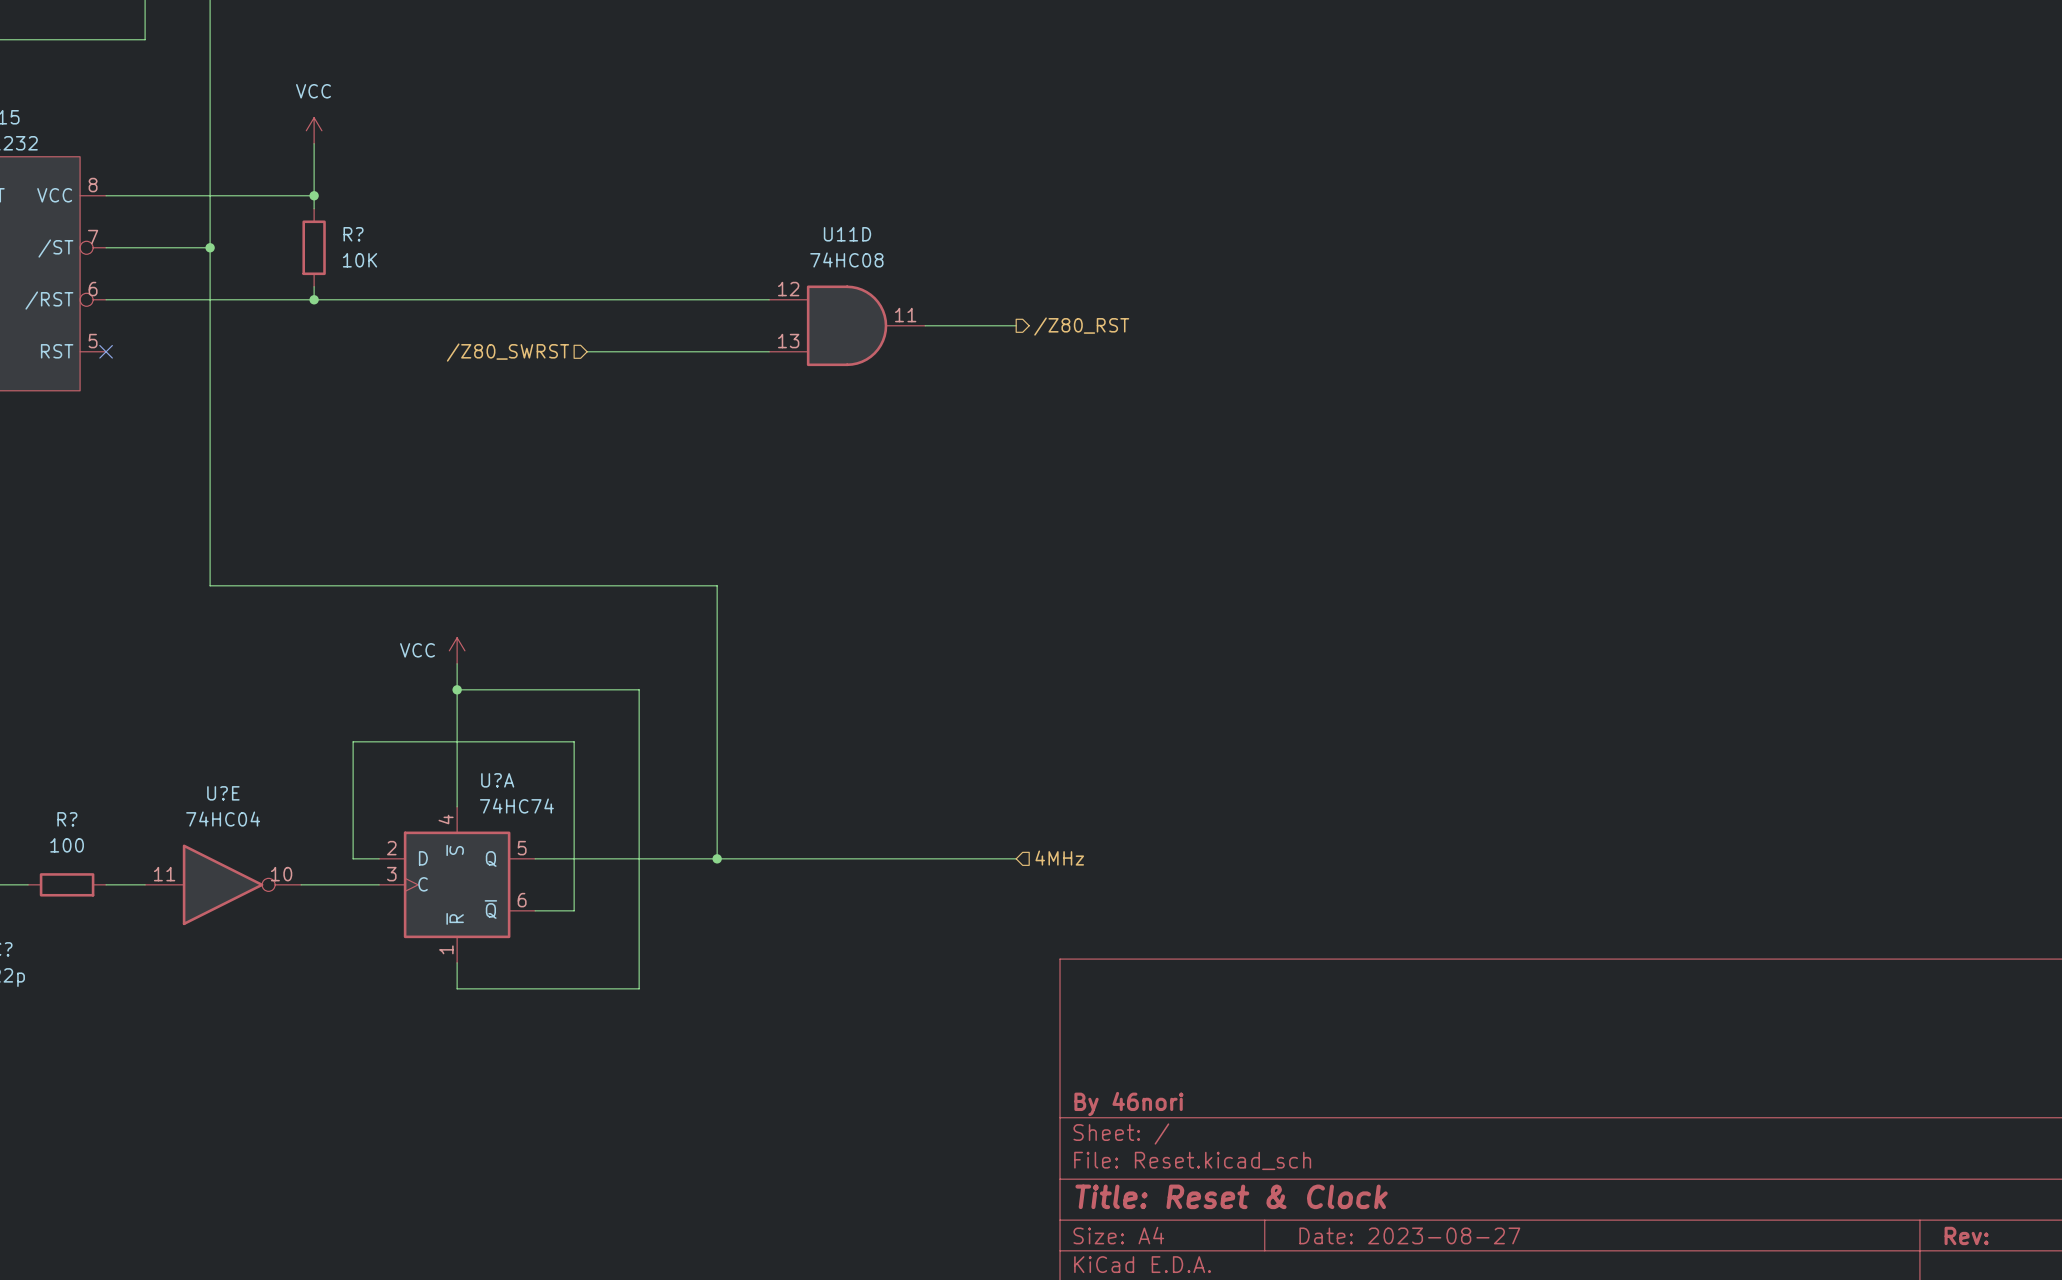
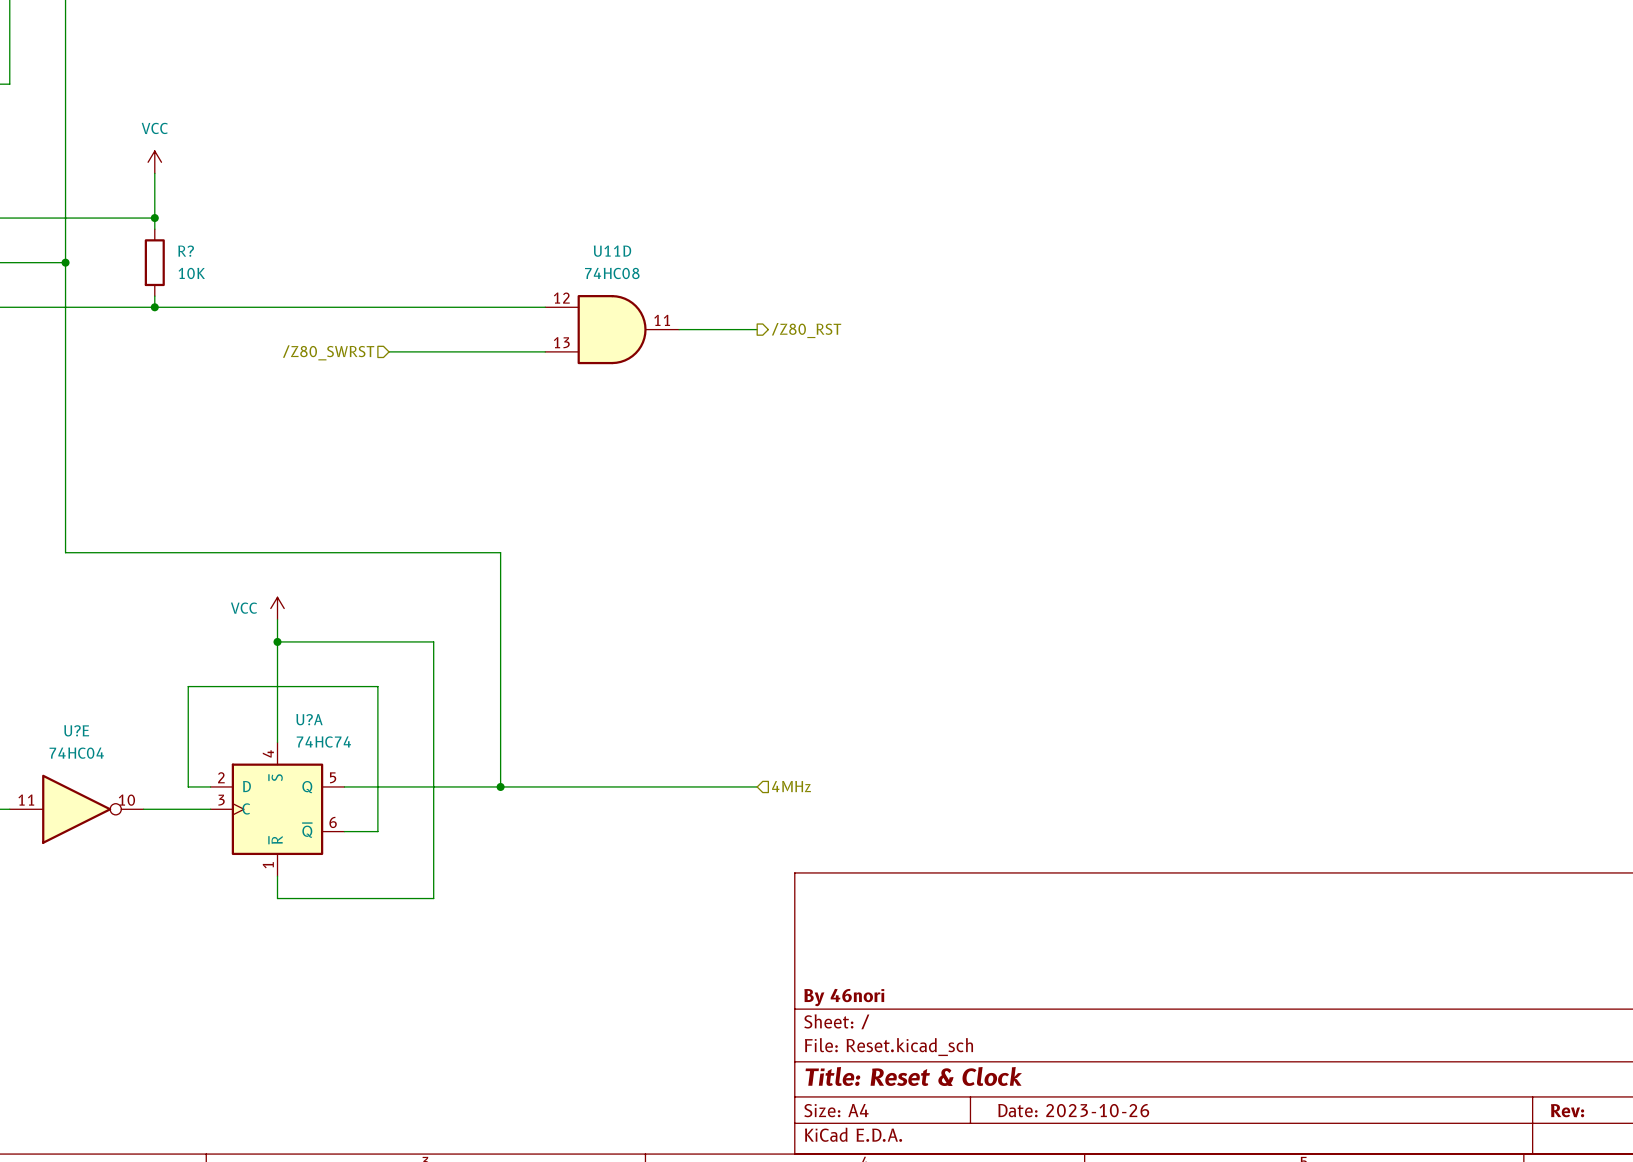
title block: Date: 2023-08-27 (1409, 1235) -> Date: 2023-10-26 (1073, 1110)

